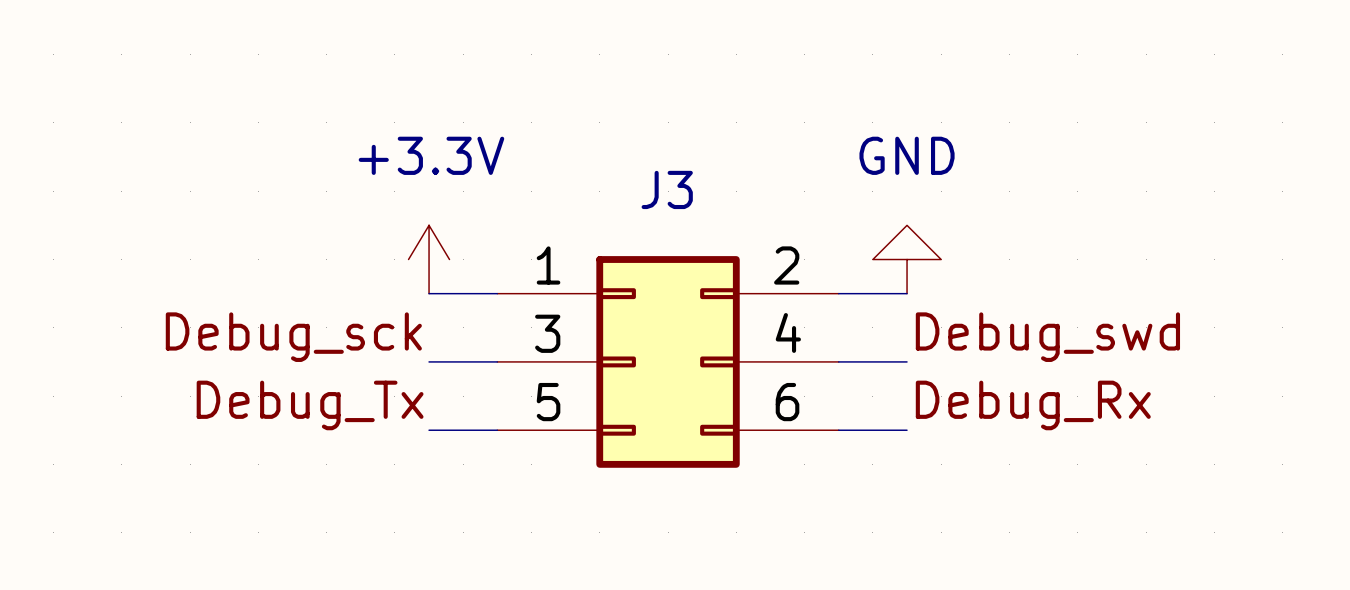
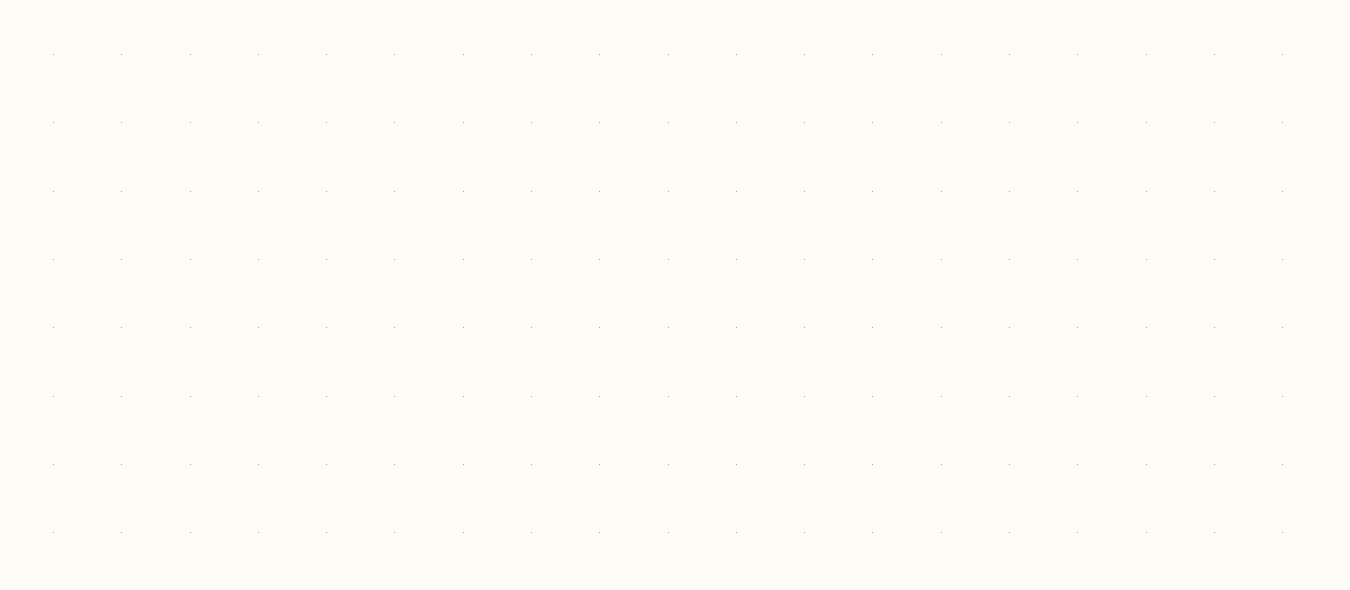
power symbol: +3.3V (429, 259) -> none
power symbol: GND (907, 259) -> none
wire: (429, 293) (497, 293) -> none
wire: (838, 293) (907, 293) -> none
label: Debug_sck (293, 337) -> none
label: Debug_swd (1047, 337) -> none
wire: (429, 361) (497, 361) -> none
J3: (668, 361) -> none
wire: (838, 361) (907, 361) -> none
label: Debug_Tx (310, 405) -> none
label: Debug_Rx (1033, 405) -> none
wire: (429, 430) (497, 430) -> none
wire: (838, 430) (907, 430) -> none

